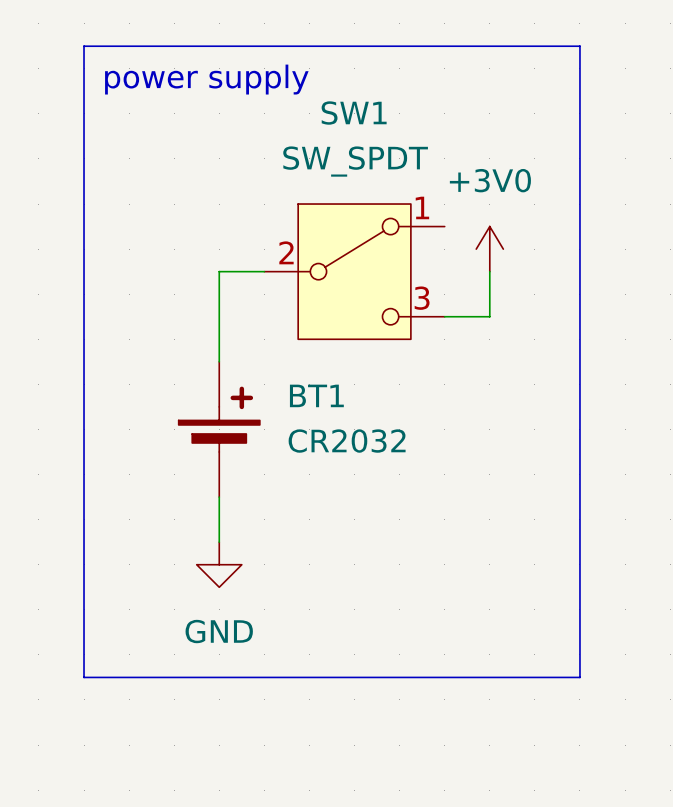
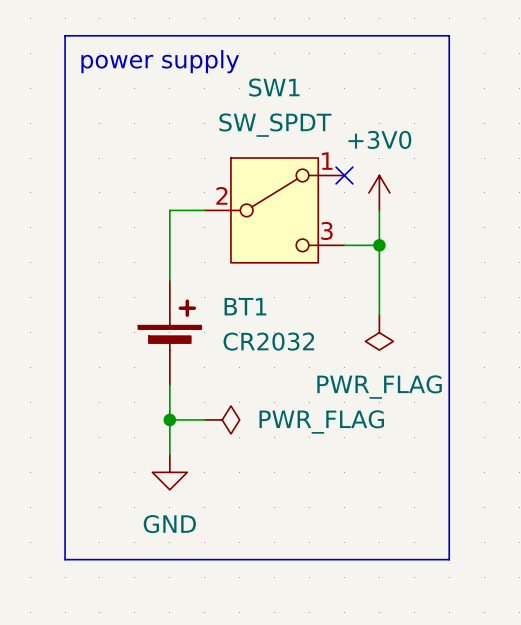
no-connect mark: none -> (344, 175)
wire: none -> (379, 245) (379, 315)
junction: none -> (379, 245)
power symbol: none -> PWR_FLAG (379, 332)
junction: none -> (169, 419)
wire: none -> (204, 419) (169, 419) (169, 454)
power symbol: none -> PWR_FLAG (222, 419)
power symbol position: GND (219, 564) -> GND (169, 472)
line: (84, 677) (579, 677) -> (65, 524) (65, 559) (449, 559) (449, 524)

